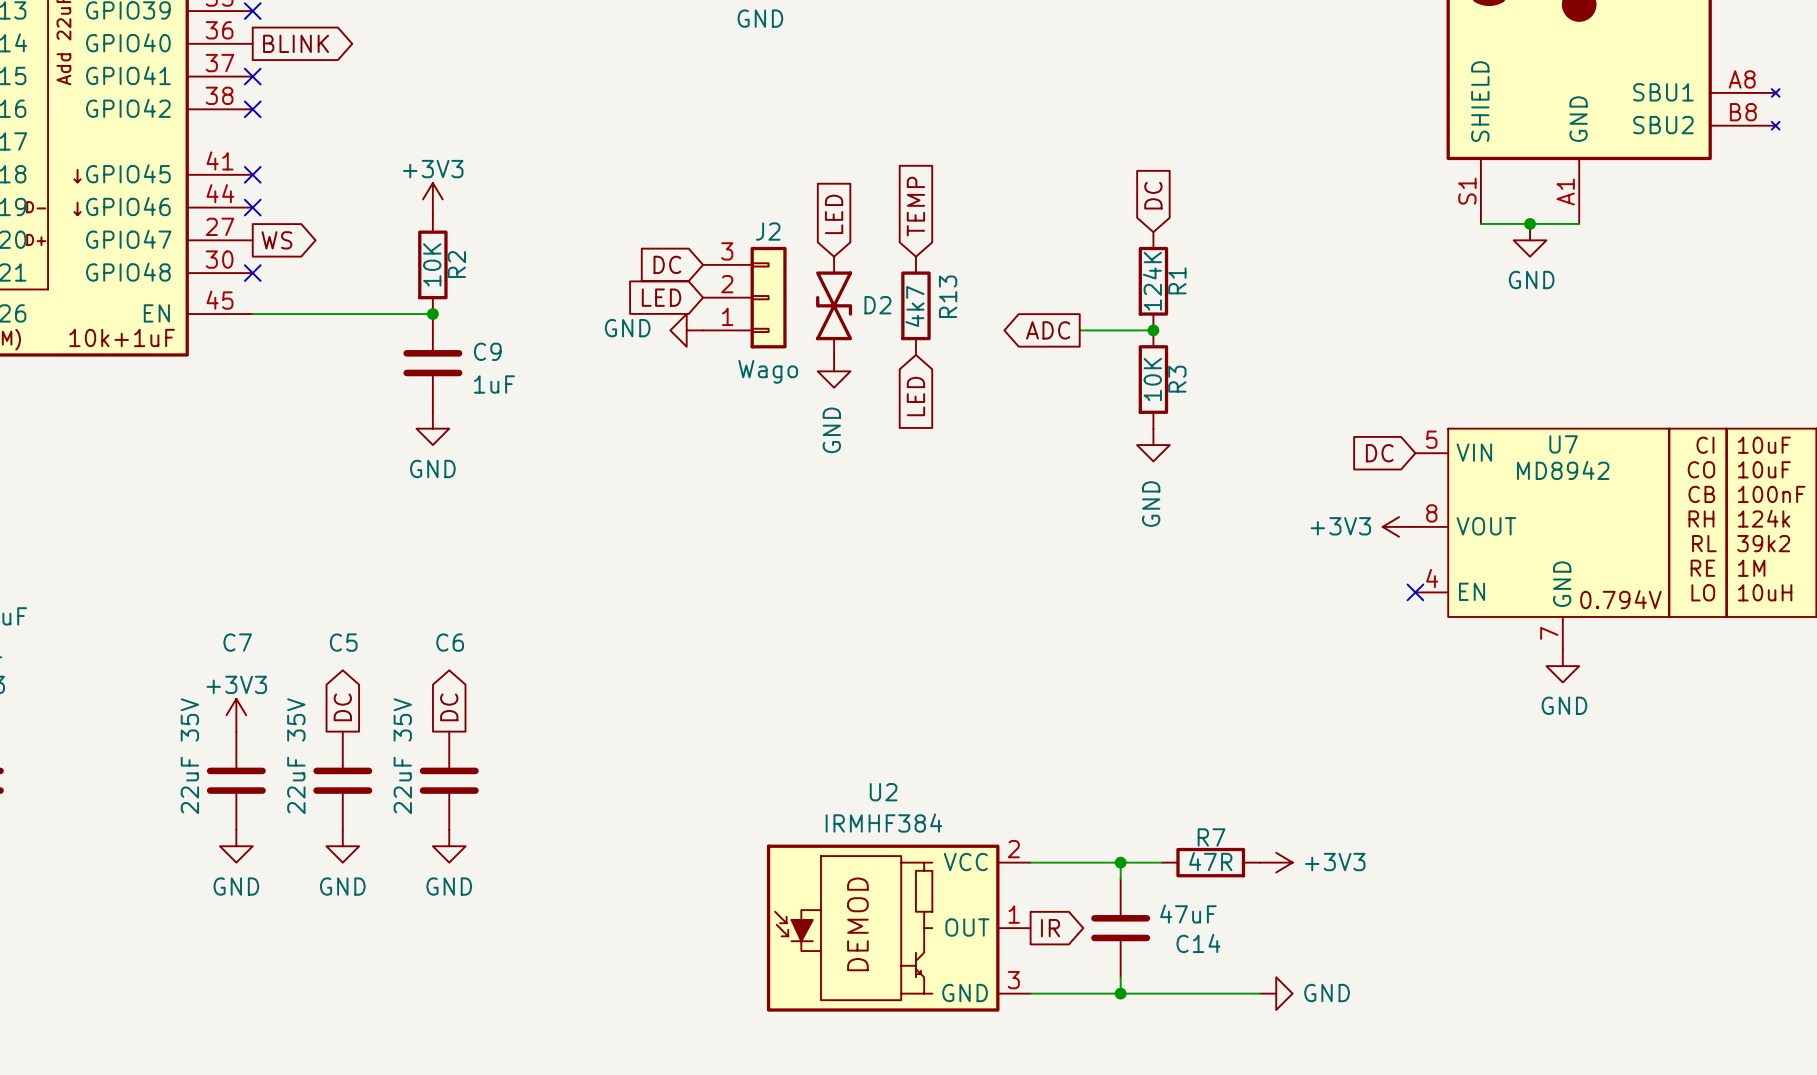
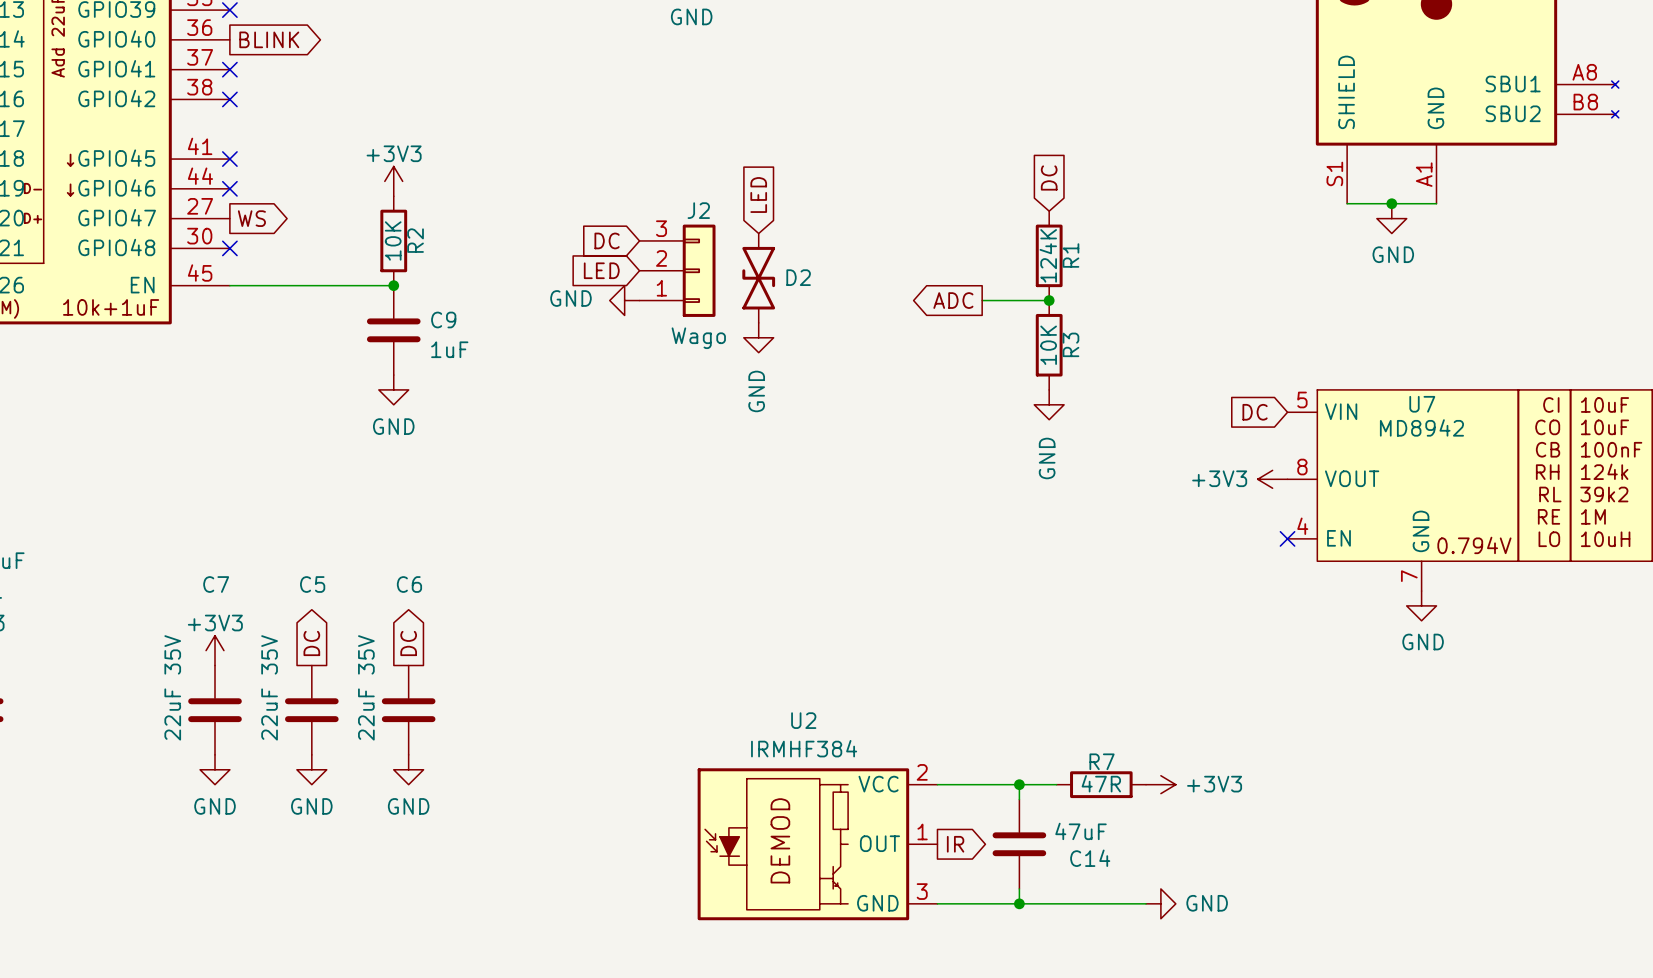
global label: TEMP (915, 206) -> none
R13: 4k7 (915, 305) -> none
global label: LED (915, 396) -> none

